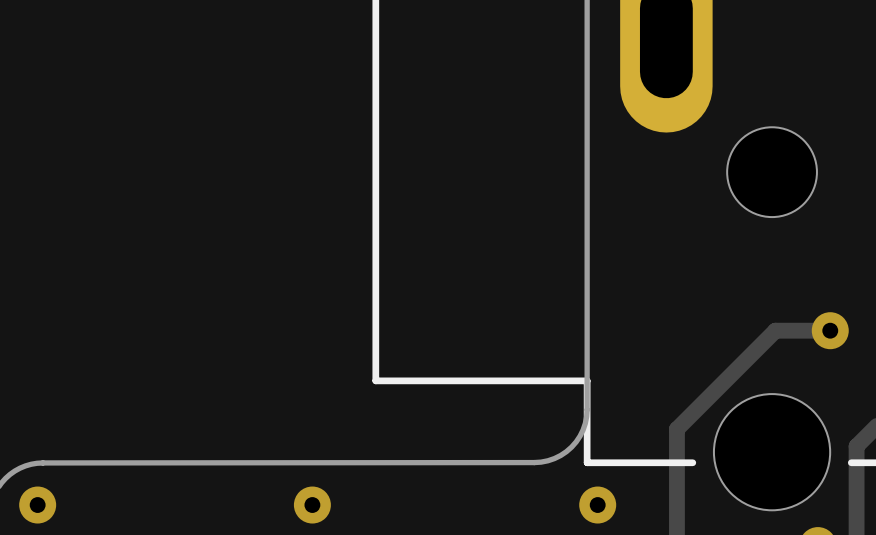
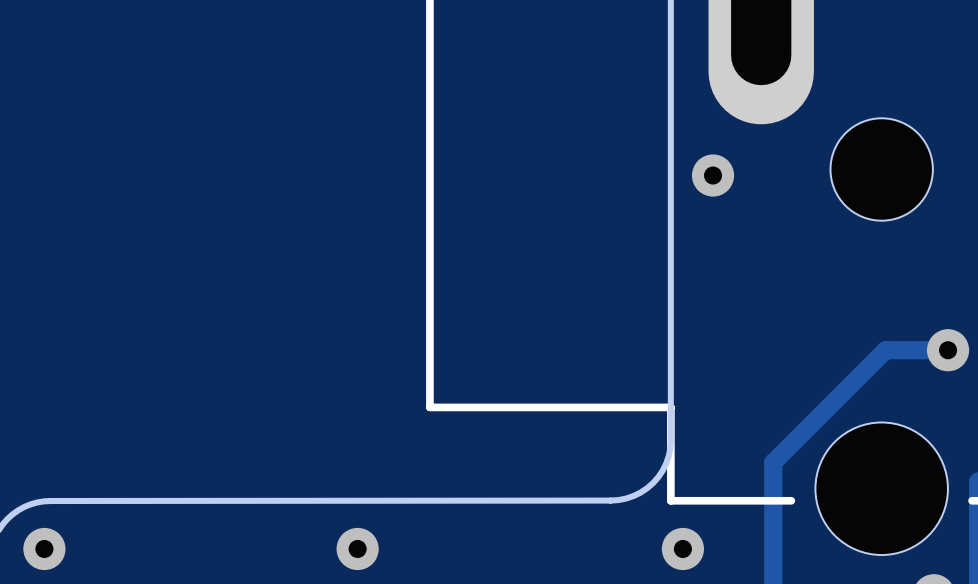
via: none -> (713, 175)

